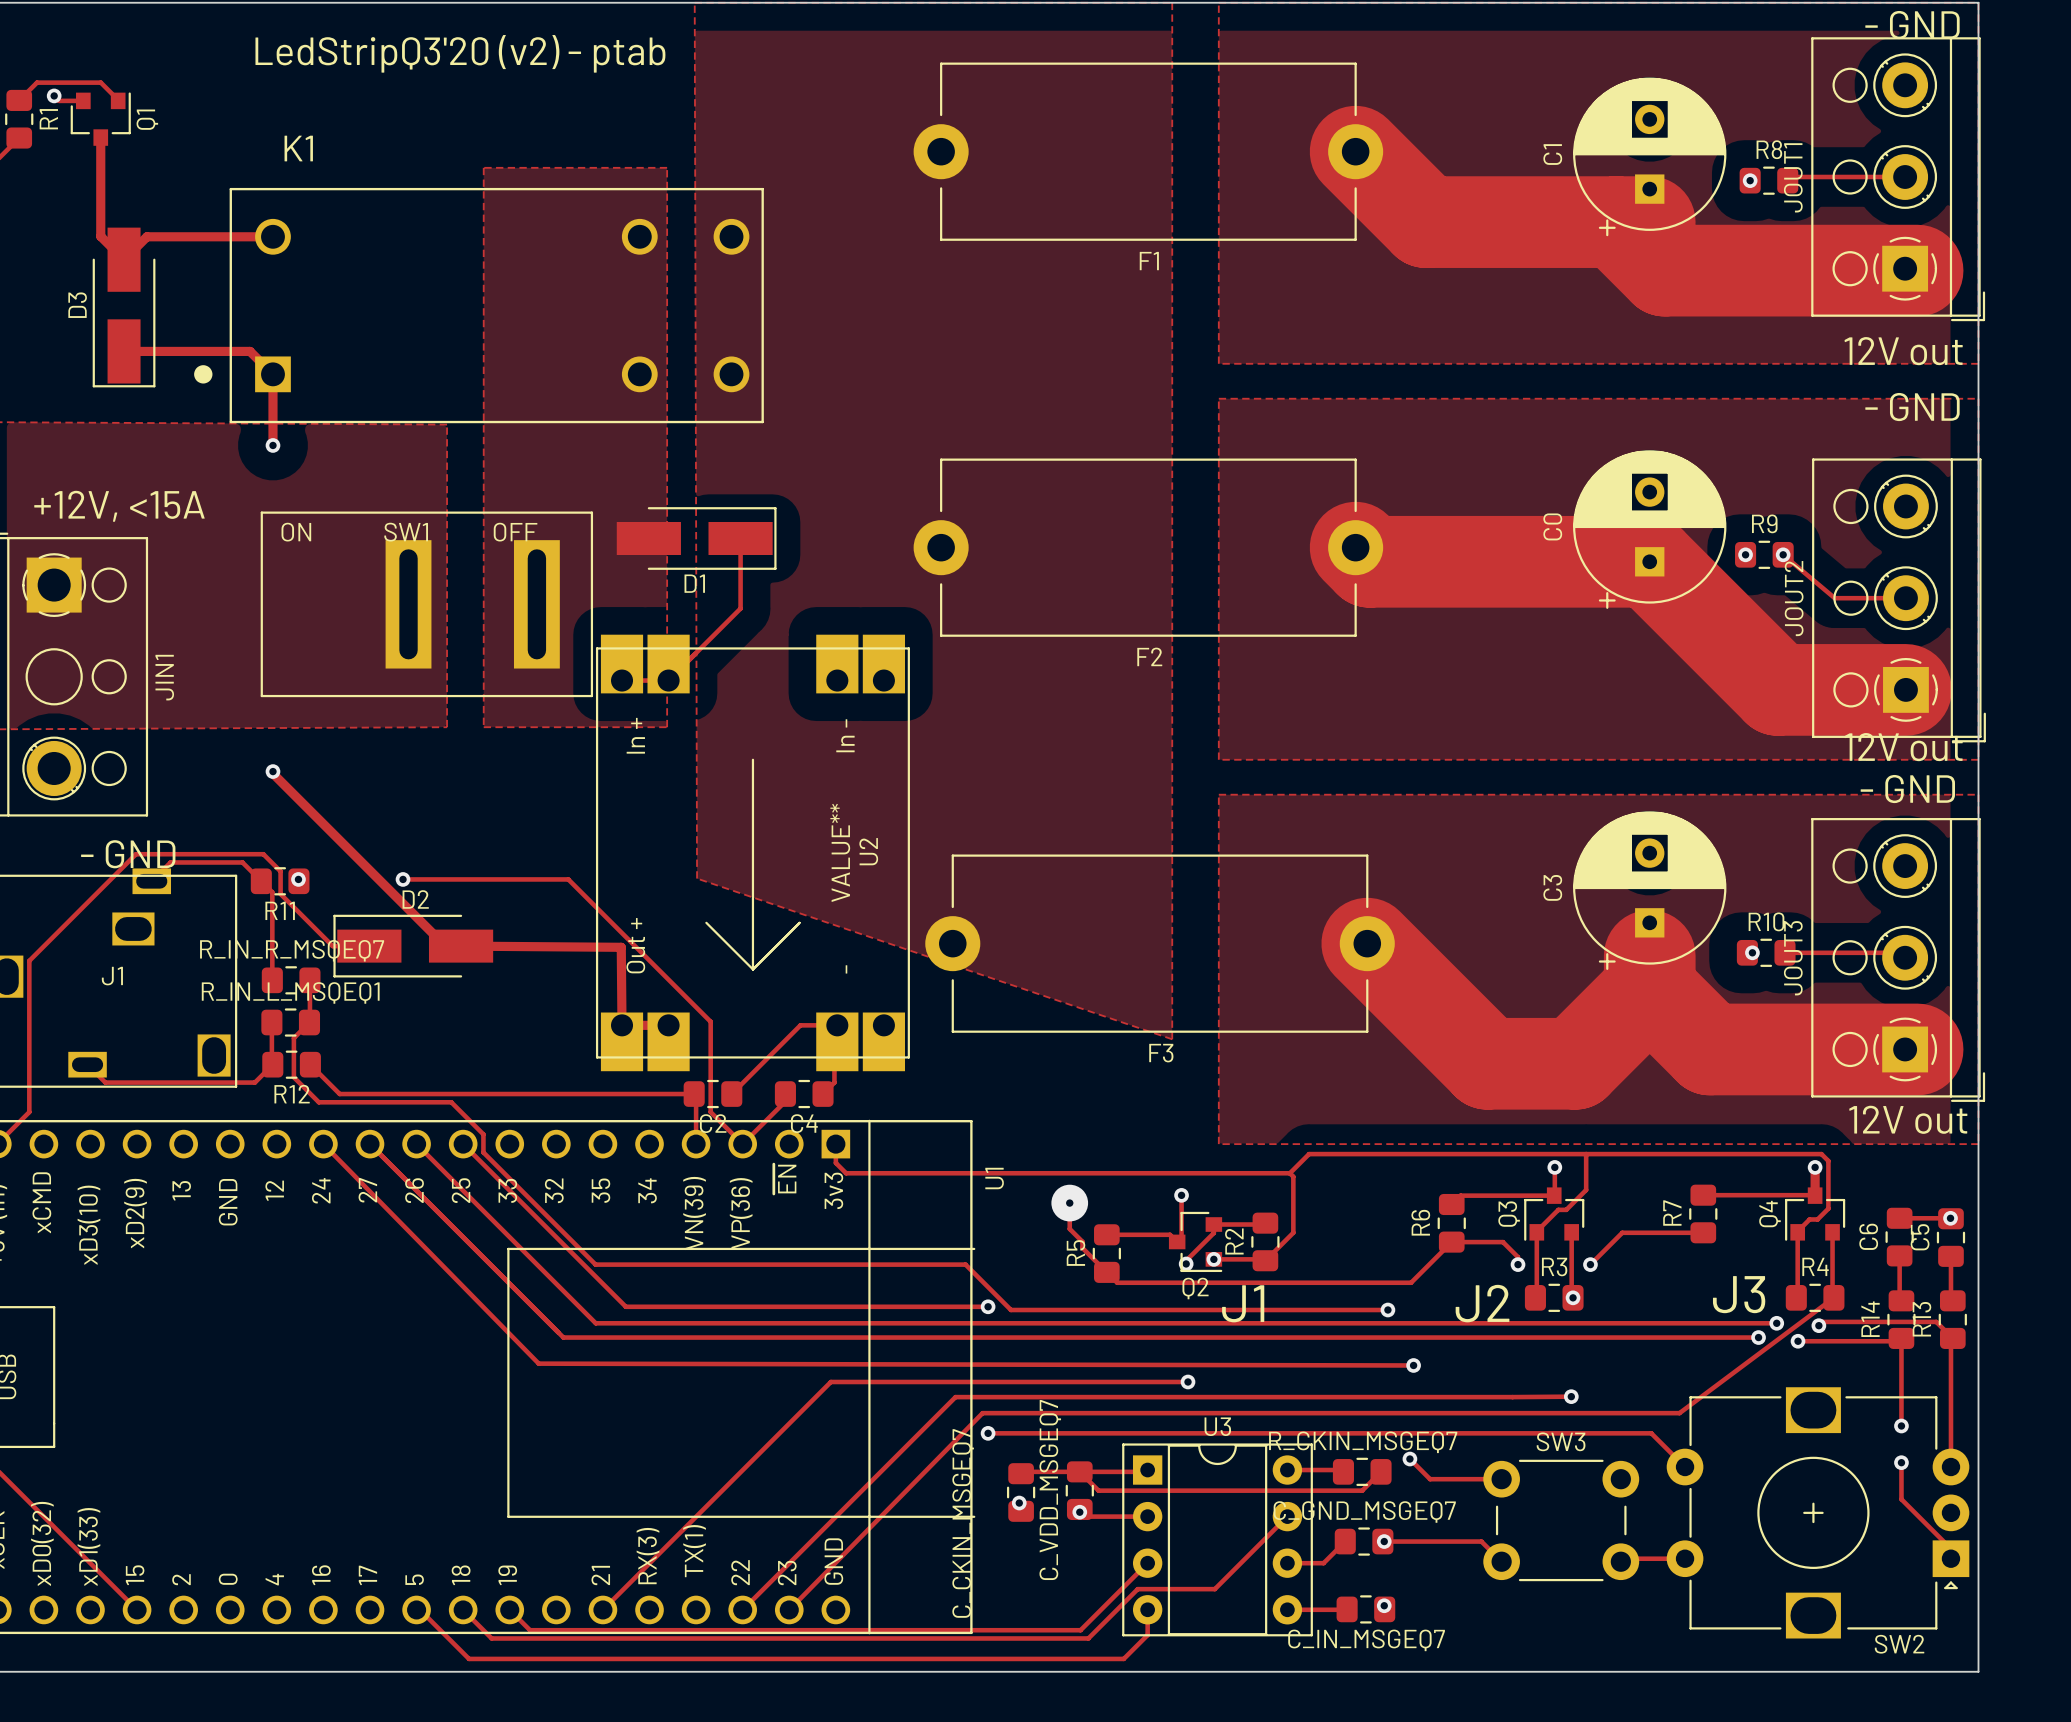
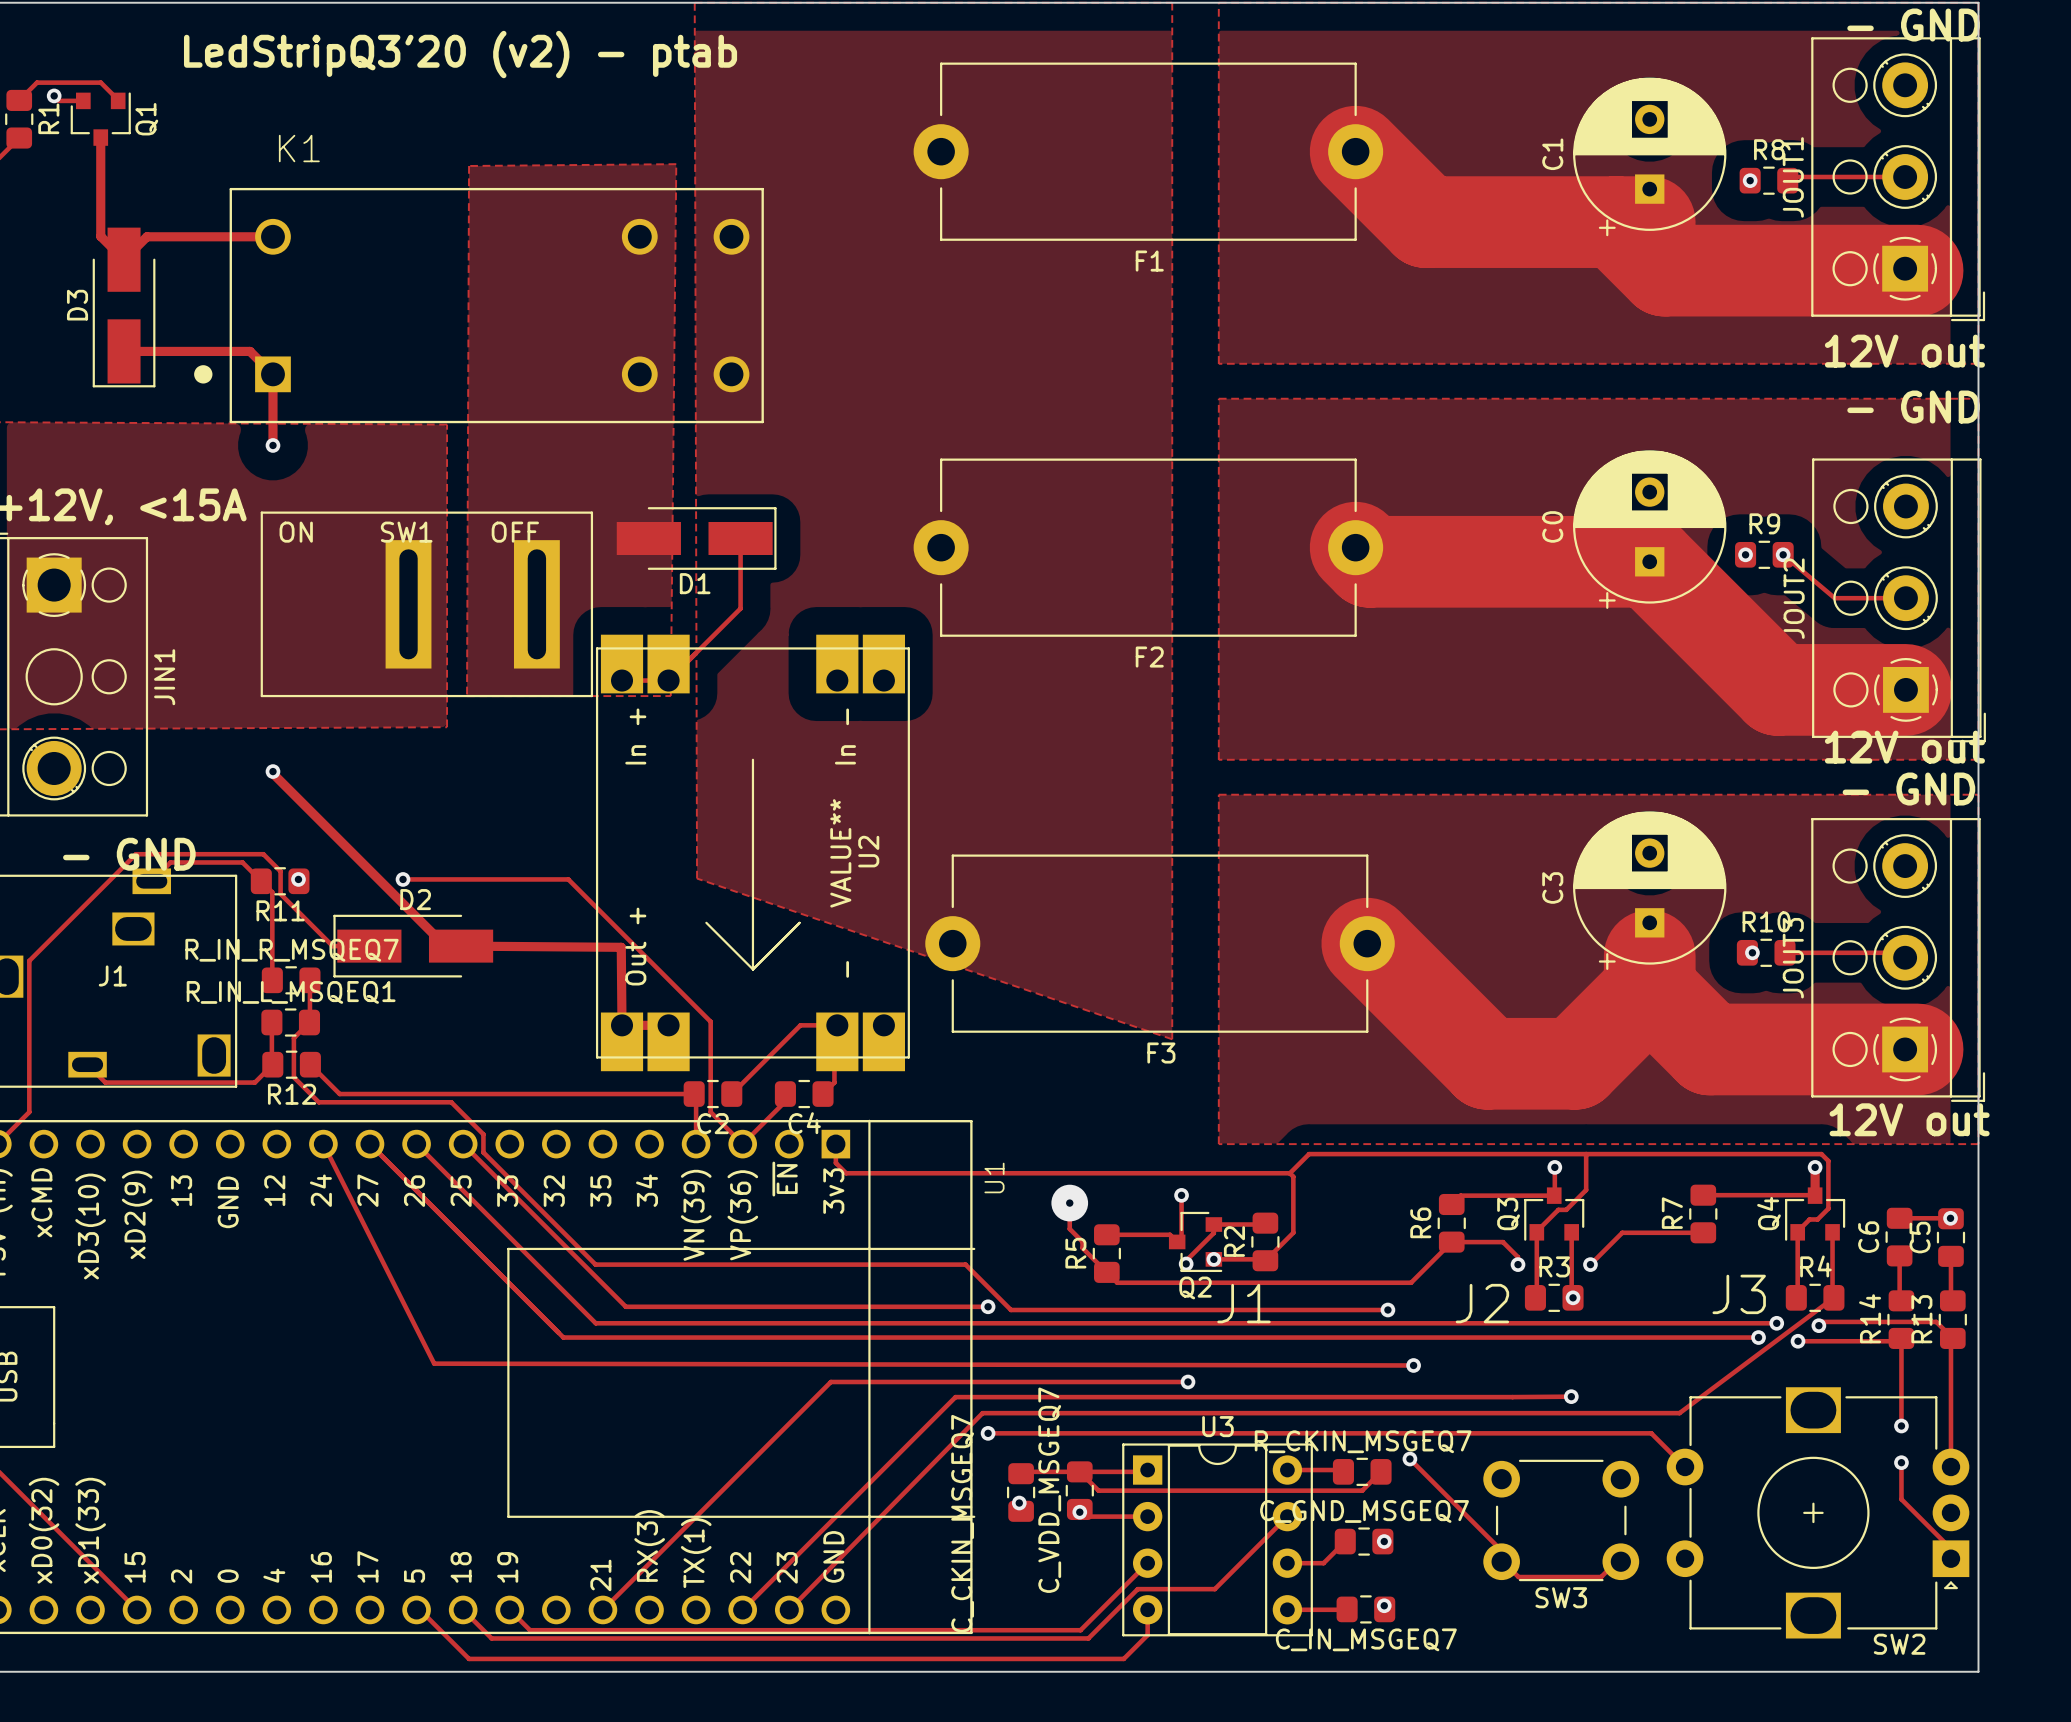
zone outline: (483, 167) (483, 727) (667, 727) (667, 167) (483, 167) -> (676, 164) (469, 165) (467, 696) (670, 696) (676, 164)
track: (323, 1144) (538, 1363) (1413, 1365) -> (323, 1144) (434, 1363) (1413, 1365)
SW3 name position: SW3 (1561, 1441) -> SW3 (1561, 1597)
track: (1430, 1479) (1501, 1479) -> (1430, 1479) (1500, 1549) (1500, 1558) (1518, 1577) (1601, 1577) (1619, 1558)
track: (1382, 1541) (1481, 1541) (1501, 1561) -> none
track: (1685, 1558) (1623, 1558) (1620, 1561) -> none

